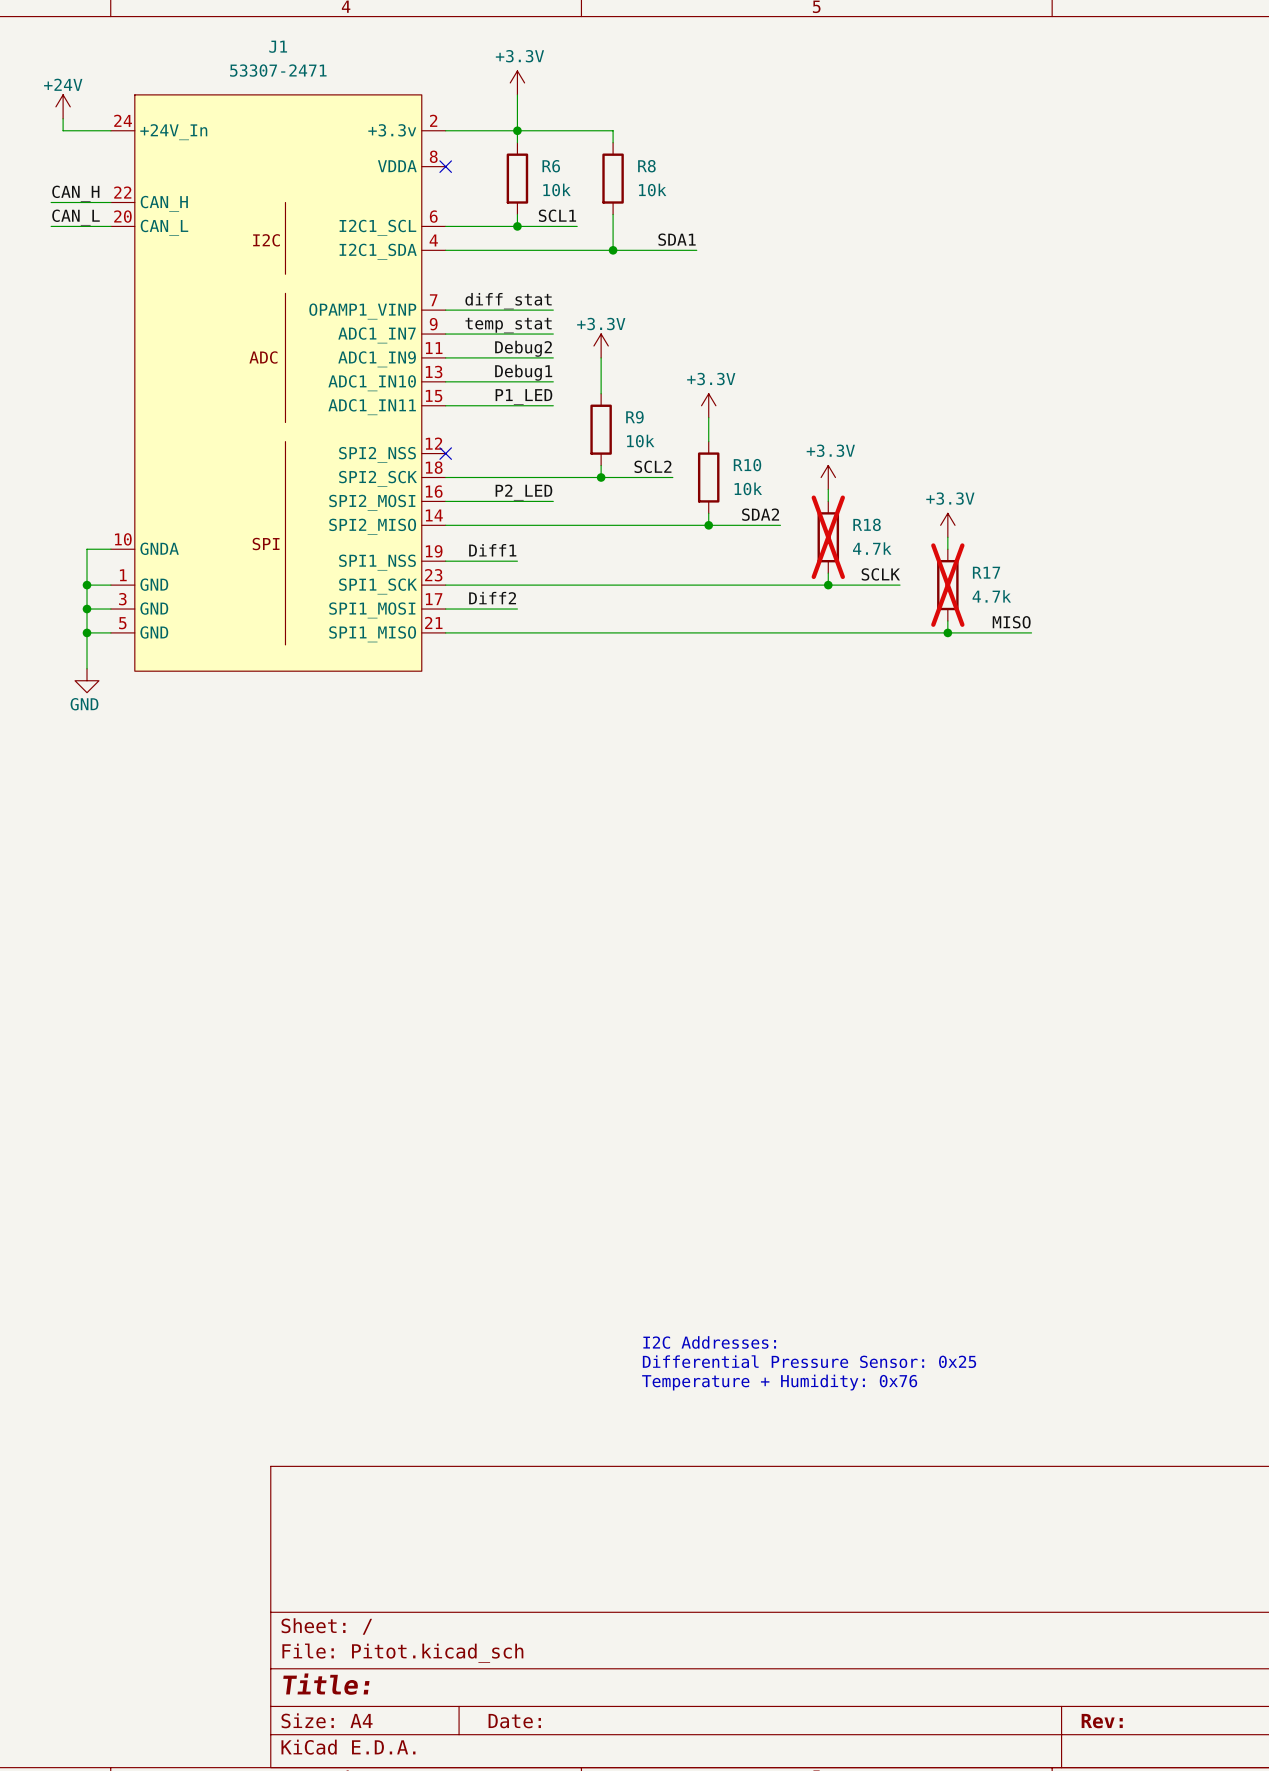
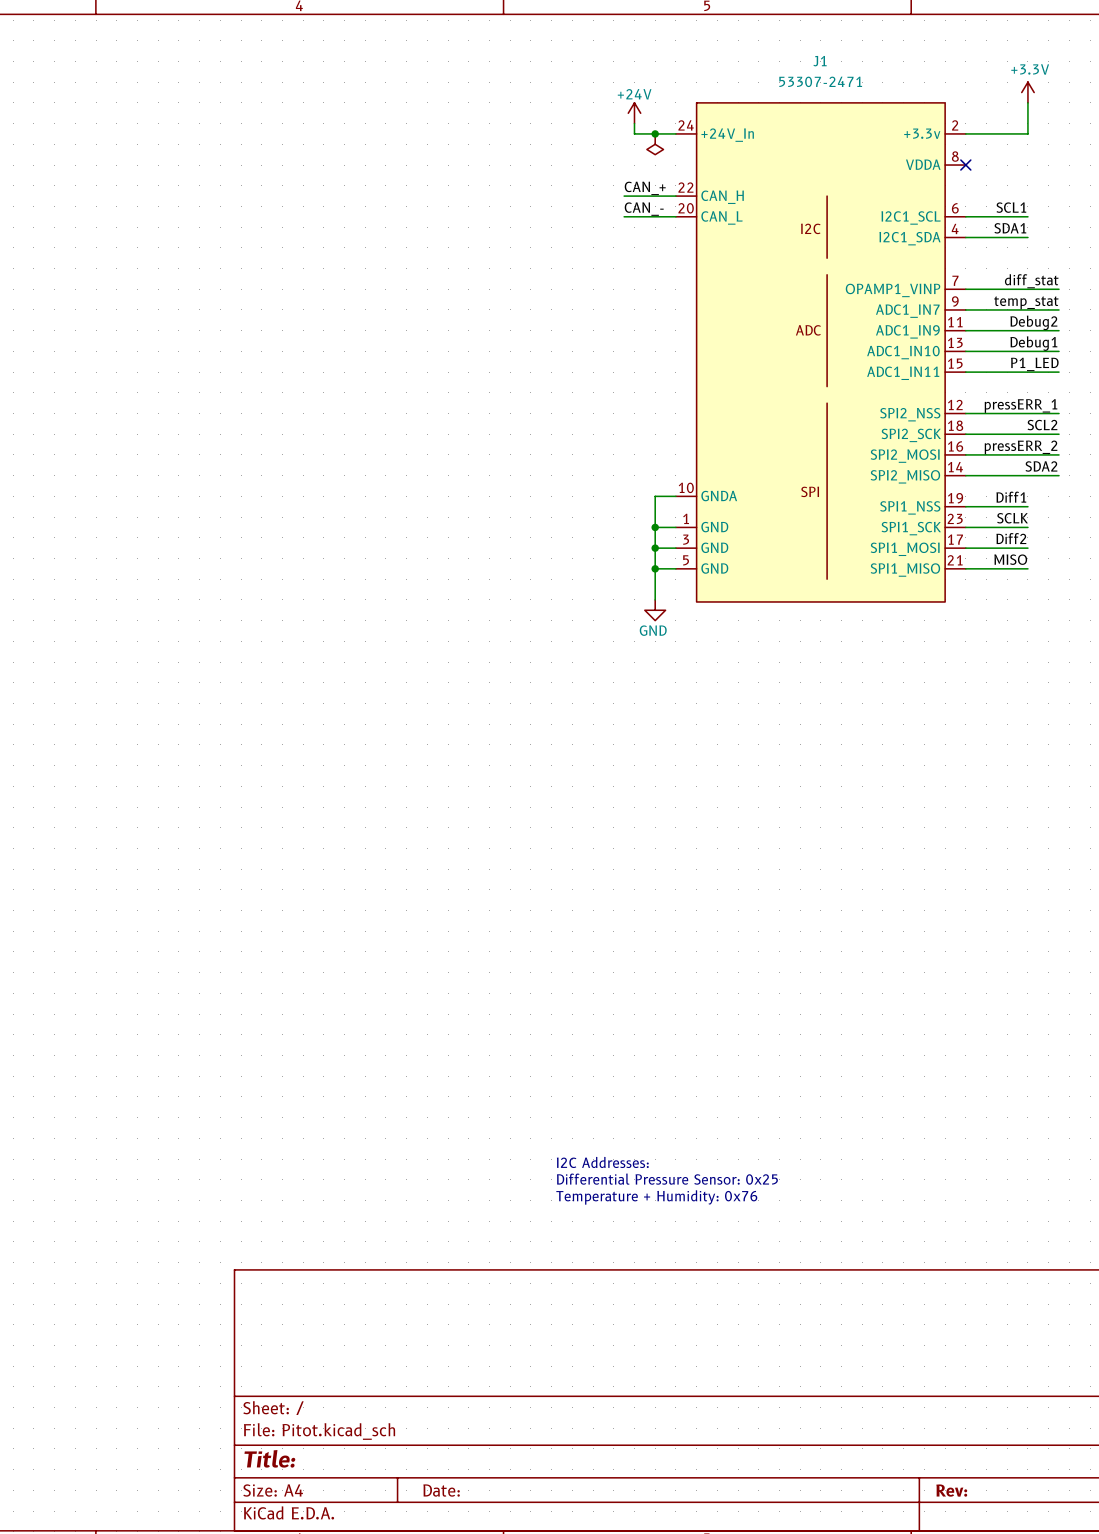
power symbol: +3.3V (517, 82) -> none
wire: (517, 94) (517, 142) -> none
power symbol: +24V (63, 106) -> none
power symbol: none -> +3.3V (1027, 92)
wire: (63, 118) (63, 130) (110, 130) -> none
wire: none -> (1027, 102) (1027, 133) (965, 133)
wire: (445, 130) (613, 130) (613, 142) -> none
junction: (517, 130) -> none
power symbol: none -> +24V (634, 113)
wire: none -> (634, 123) (634, 133) (675, 133)
junction: none -> (655, 133)
no-connect mark: (445, 166) -> none
power symbol: none -> (655, 144)
R6: 10k (517, 178) -> none
R8: 10k (613, 178) -> none
no-connect mark: none -> (965, 165)
label: CAN_H (75, 193) -> none
wire: (51, 202) (110, 202) -> none
wire: (517, 214) (517, 226) -> none
wire: (613, 214) (613, 250) -> none
label: SCL1 (557, 215) -> none
label: CAN_L (75, 217) -> none
label: none -> CAN_+ (645, 188)
wire: (51, 226) (110, 226) -> none
wire: (445, 226) (577, 226) -> none
junction: (517, 226) -> none
wire: none -> (624, 196) (675, 196)
label: SDA1 (677, 239) -> none
label: none -> SCL1 (1011, 207)
label: none -> CAN_- (644, 209)
wire: (445, 250) (696, 250) -> none
junction: (613, 250) -> none
wire: none -> (624, 216) (675, 216)
wire: none -> (965, 216) (1027, 216)
label: none -> SDA1 (1010, 228)
wire: none -> (965, 237) (1027, 237)
label: diff_stat (508, 301) -> none
wire: (445, 310) (553, 310) -> none
label: temp_stat (508, 325) -> none
label: none -> diff_stat (1031, 281)
wire: (445, 334) (553, 334) -> none
wire: none -> (965, 289) (1059, 289)
power symbol: +3.3V (601, 345) -> none
label: Debug2 (523, 348) -> none
label: none -> temp_stat (1026, 302)
wire: (445, 357) (553, 357) -> none
wire: (601, 357) (601, 393) -> none
wire: none -> (965, 309) (1059, 309)
label: Debug1 (523, 372) -> none
label: none -> Debug2 (1033, 322)
wire: (445, 381) (553, 381) -> none
wire: none -> (965, 330) (1059, 330)
J1 position: (278, 383) -> (820, 352)
label: none -> Debug1 (1033, 343)
label: P1_LED (523, 397) -> none
wire: (445, 405) (553, 405) -> none
power symbol: +3.3V (708, 405) -> none
wire: none -> (965, 351) (1059, 351)
wire: (708, 417) (708, 441) -> none
label: none -> P1_LED (1034, 364)
R9: 10k (601, 429) -> none
wire: none -> (965, 372) (1059, 372)
no-connect mark: (445, 453) -> none
wire: (601, 465) (601, 477) -> none
label: SCL2 (652, 466) -> none
label: none -> pressERR_1 (1021, 405)
wire: (445, 477) (672, 477) -> none
junction: (601, 477) -> none
R10: 10k (708, 477) -> none
power symbol: +3.3V (828, 477) -> none
wire: none -> (965, 413) (1059, 413)
label: none -> SCL2 (1042, 425)
label: P2_LED (523, 492) -> none
wire: (445, 501) (553, 501) -> none
wire: none -> (965, 434) (1059, 434)
wire: (708, 513) (708, 525) -> none
label: SDA2 (760, 514) -> none
label: none -> pressERR_2 (1021, 447)
wire: (445, 525) (780, 525) -> none
junction: (708, 525) -> none
power symbol: +3.3V (947, 525) -> none
wire: none -> (965, 454) (1059, 454)
R18: 4.7k (828, 537) -> none
label: none -> SDA2 (1041, 466)
wire: (110, 549) (87, 549) (87, 668) -> none
wire: none -> (965, 475) (1059, 475)
label: Diff1 (492, 550) -> none
wire: (445, 561) (517, 561) -> none
wire: none -> (675, 496) (655, 496) (655, 599)
label: SCLK (880, 574) -> none
label: none -> Diff1 (1011, 497)
wire: (87, 585) (110, 585) -> none
junction: (87, 585) -> none
wire: (445, 585) (900, 585) -> none
junction: (828, 585) -> none
R17: 4.7k (947, 585) -> none
wire: none -> (965, 506) (1027, 506)
label: Diff2 (492, 598) -> none
label: none -> SCLK (1012, 518)
wire: (87, 609) (110, 609) -> none
junction: (87, 609) -> none
wire: (445, 609) (517, 609) -> none
wire: none -> (655, 527) (675, 527)
junction: none -> (655, 527)
wire: none -> (965, 527) (1027, 527)
label position: MISO (1011, 622) -> MISO (1010, 559)
label: none -> Diff2 (1011, 538)
wire: (87, 632) (110, 632) -> none
junction: (87, 632) -> none
wire: (445, 632) (756, 632) -> none
junction: none -> (655, 548)
junction: (947, 632) -> none
wire: none -> (965, 548) (1027, 548)
wire: none -> (655, 568) (675, 568)
junction: none -> (655, 568)
wire: none -> (965, 568) (1027, 568)
power symbol: GND (87, 680) -> none
power symbol: none -> GND (655, 610)

